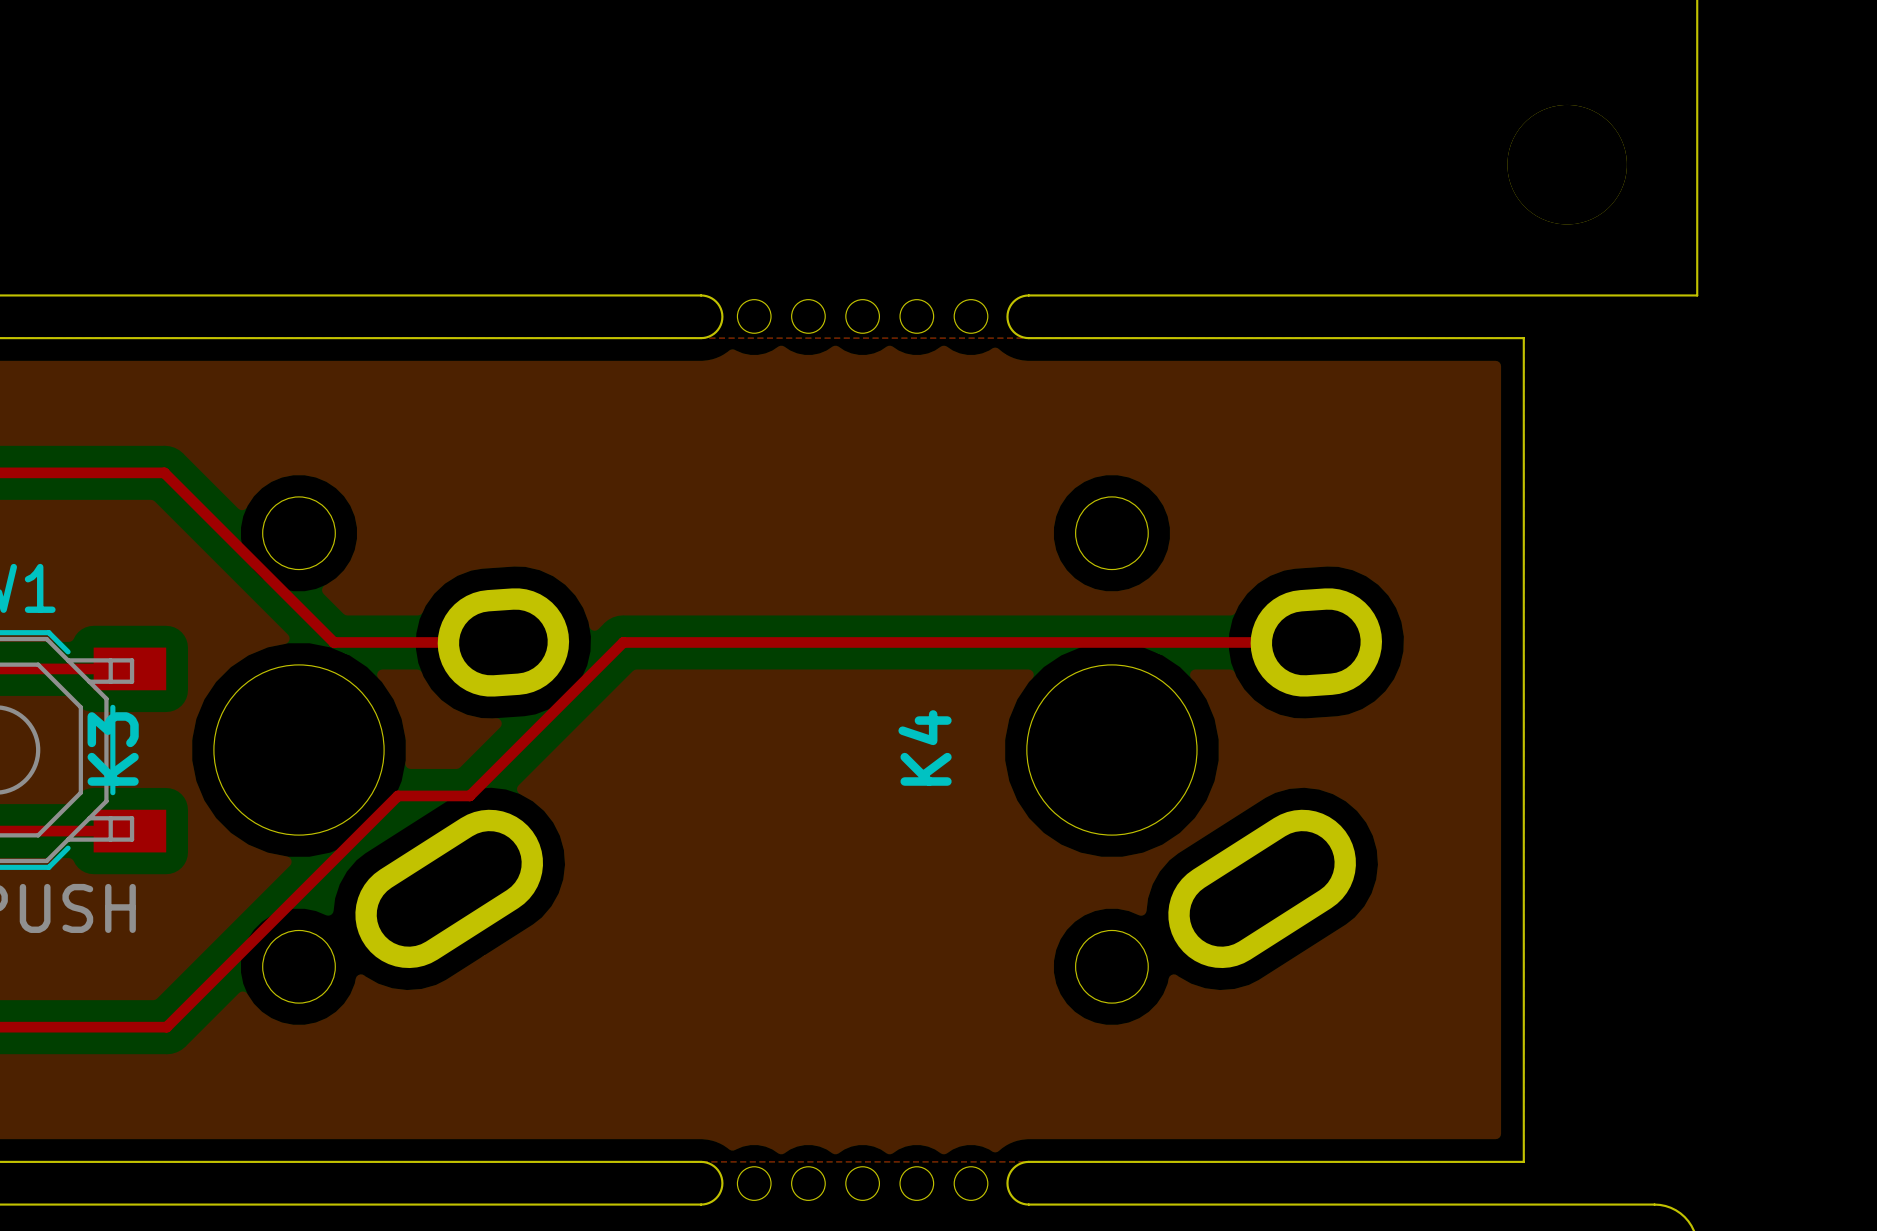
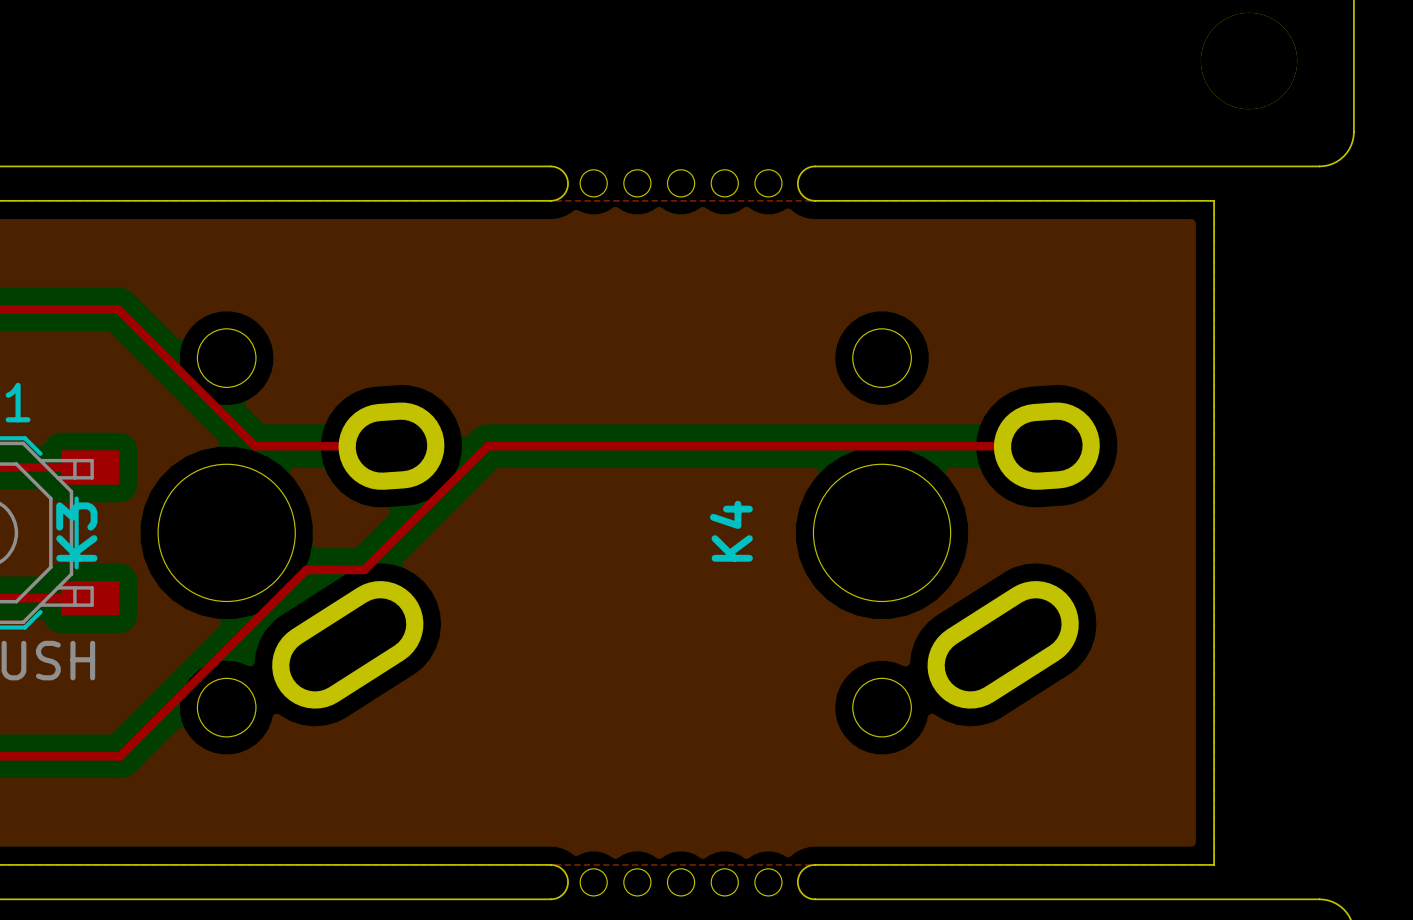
board edge: (1697, 252) (1697, 295) (1654, 295) -> (1353, 132) (1351, 145) (1343, 156) (1332, 163) (1319, 166)

